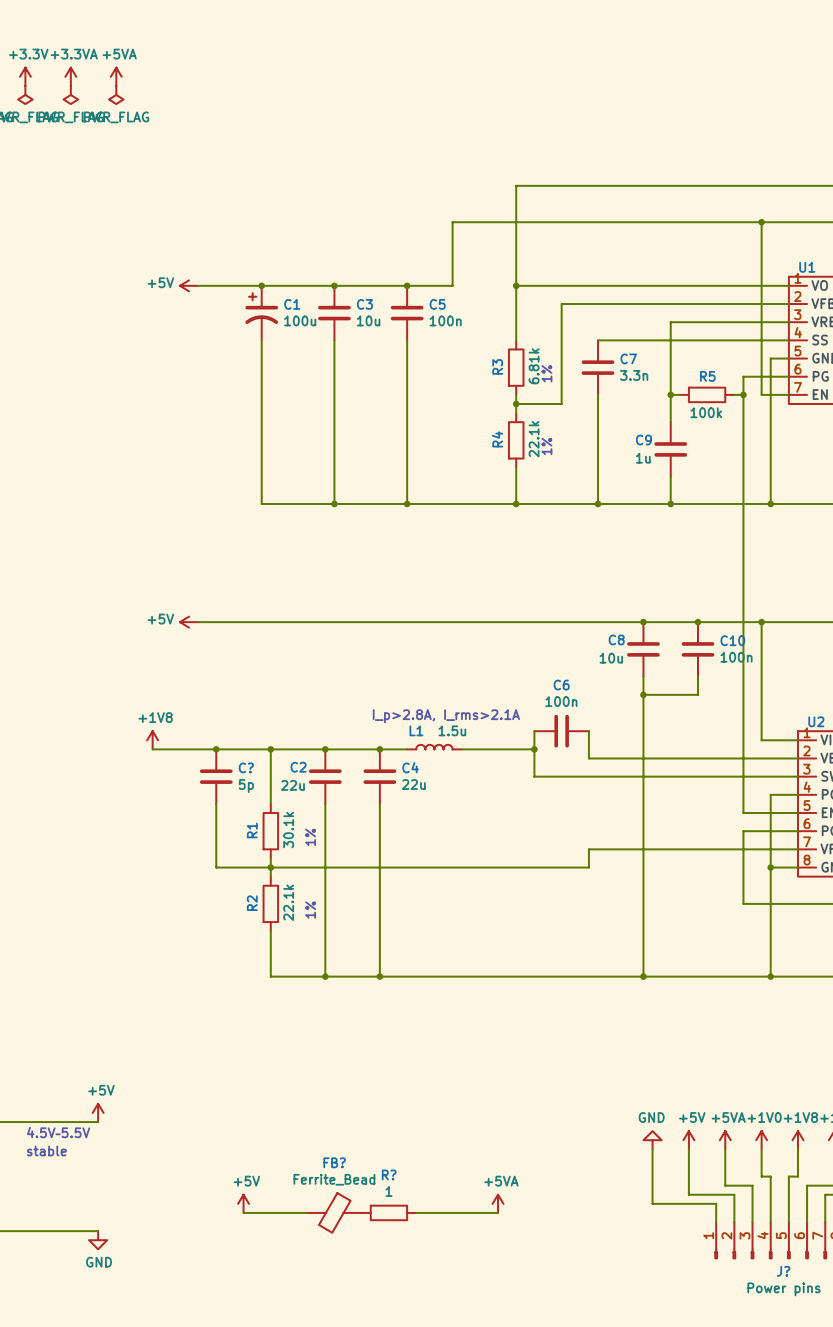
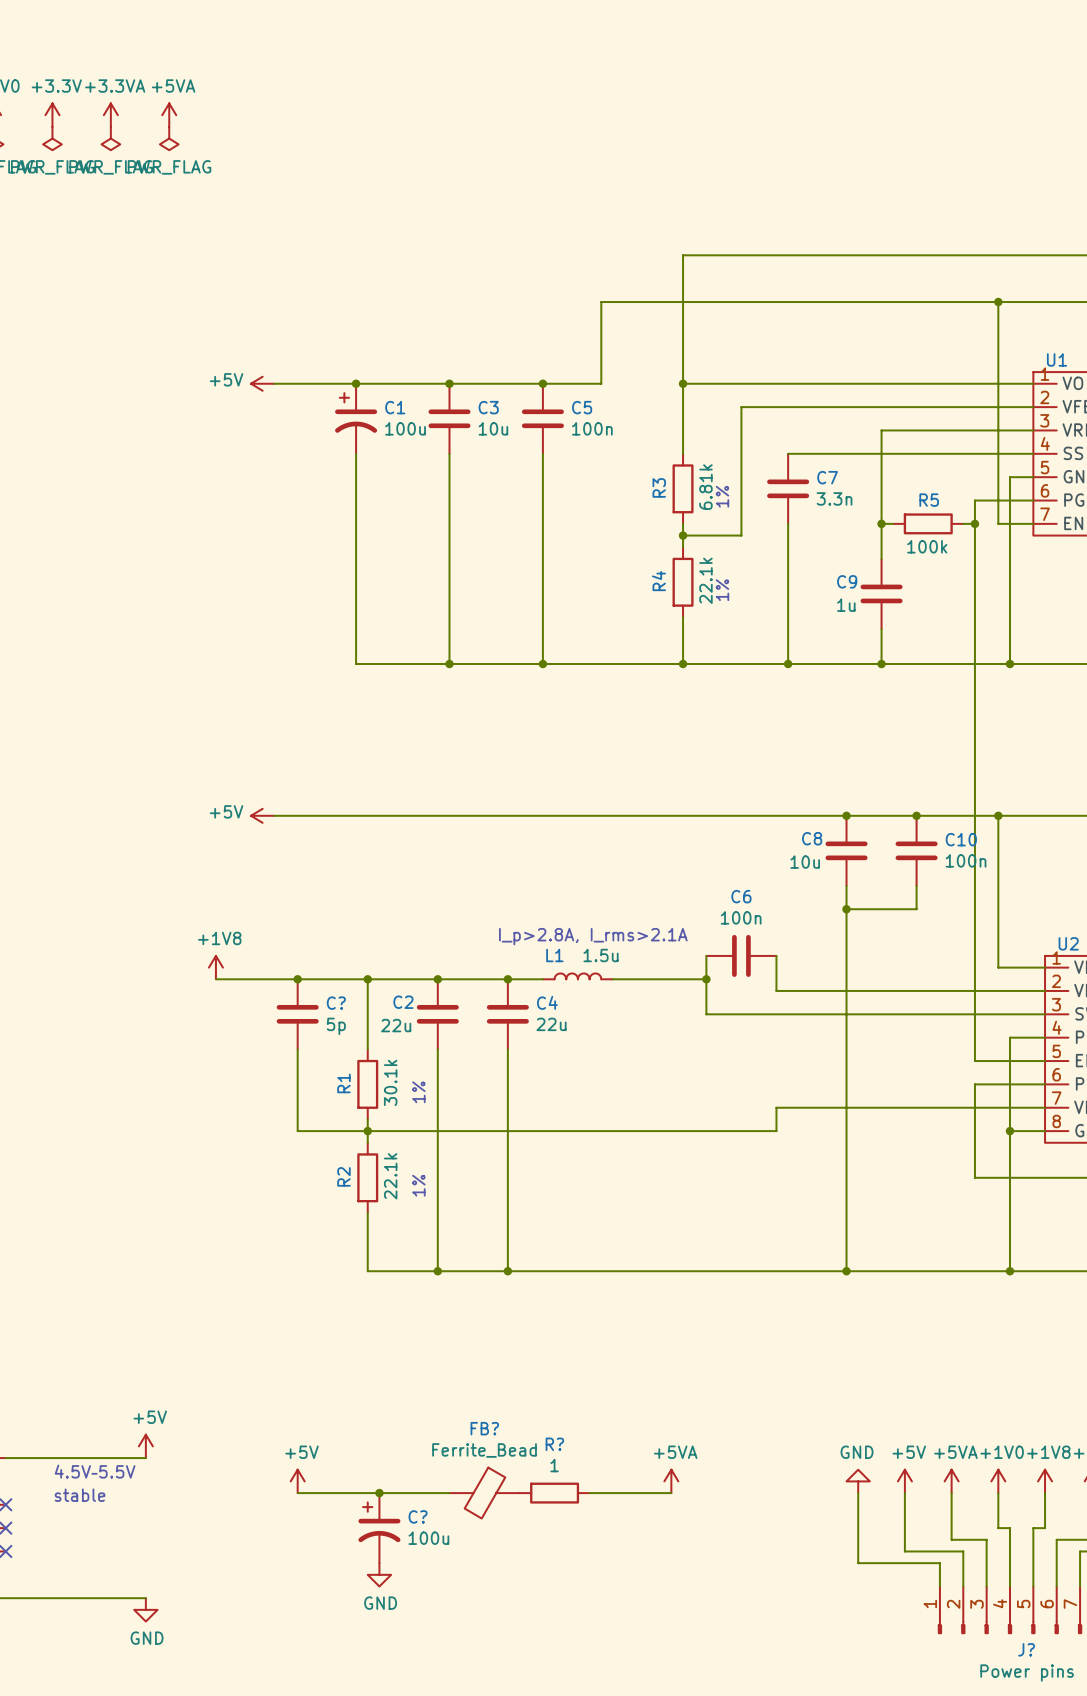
wire: none -> (297, 1493) (449, 1493)
junction: none -> (379, 1493)
wire: none -> (589, 1493) (671, 1493)
C?: none -> 100u (379, 1528)
power symbol position: +5V (243, 1203) -> +5V (297, 1481)
power symbol position: +5VA (498, 1203) -> +5VA (671, 1481)
wire: (243, 1212) (307, 1212) -> none
power symbol: none -> GND (379, 1574)
FB? position: (334, 1212) -> (484, 1493)
R? position: (388, 1212) -> (554, 1493)
wire: (416, 1212) (498, 1212) -> none

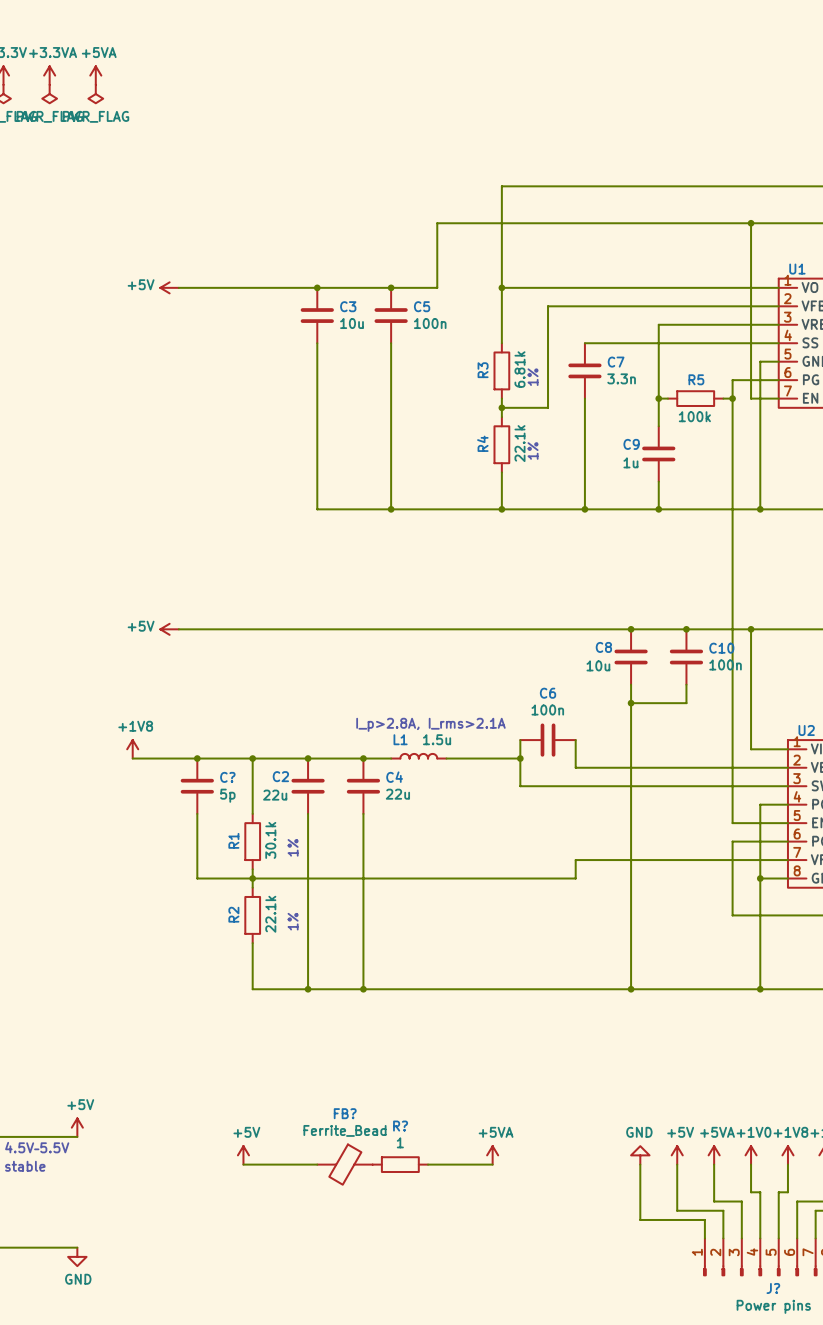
junction: (356, 383) -> none
C1: 100u (356, 418) -> none
wire: (356, 453) (356, 664) (449, 664) -> none
junction: (449, 664) -> none
power symbol position: +5V (297, 1481) -> +5V (243, 1155)
wire: (297, 1493) (356, 1493) -> none
junction: (379, 1493) -> none
C?: 100u (379, 1528) -> none
power symbol: GND (379, 1574) -> none

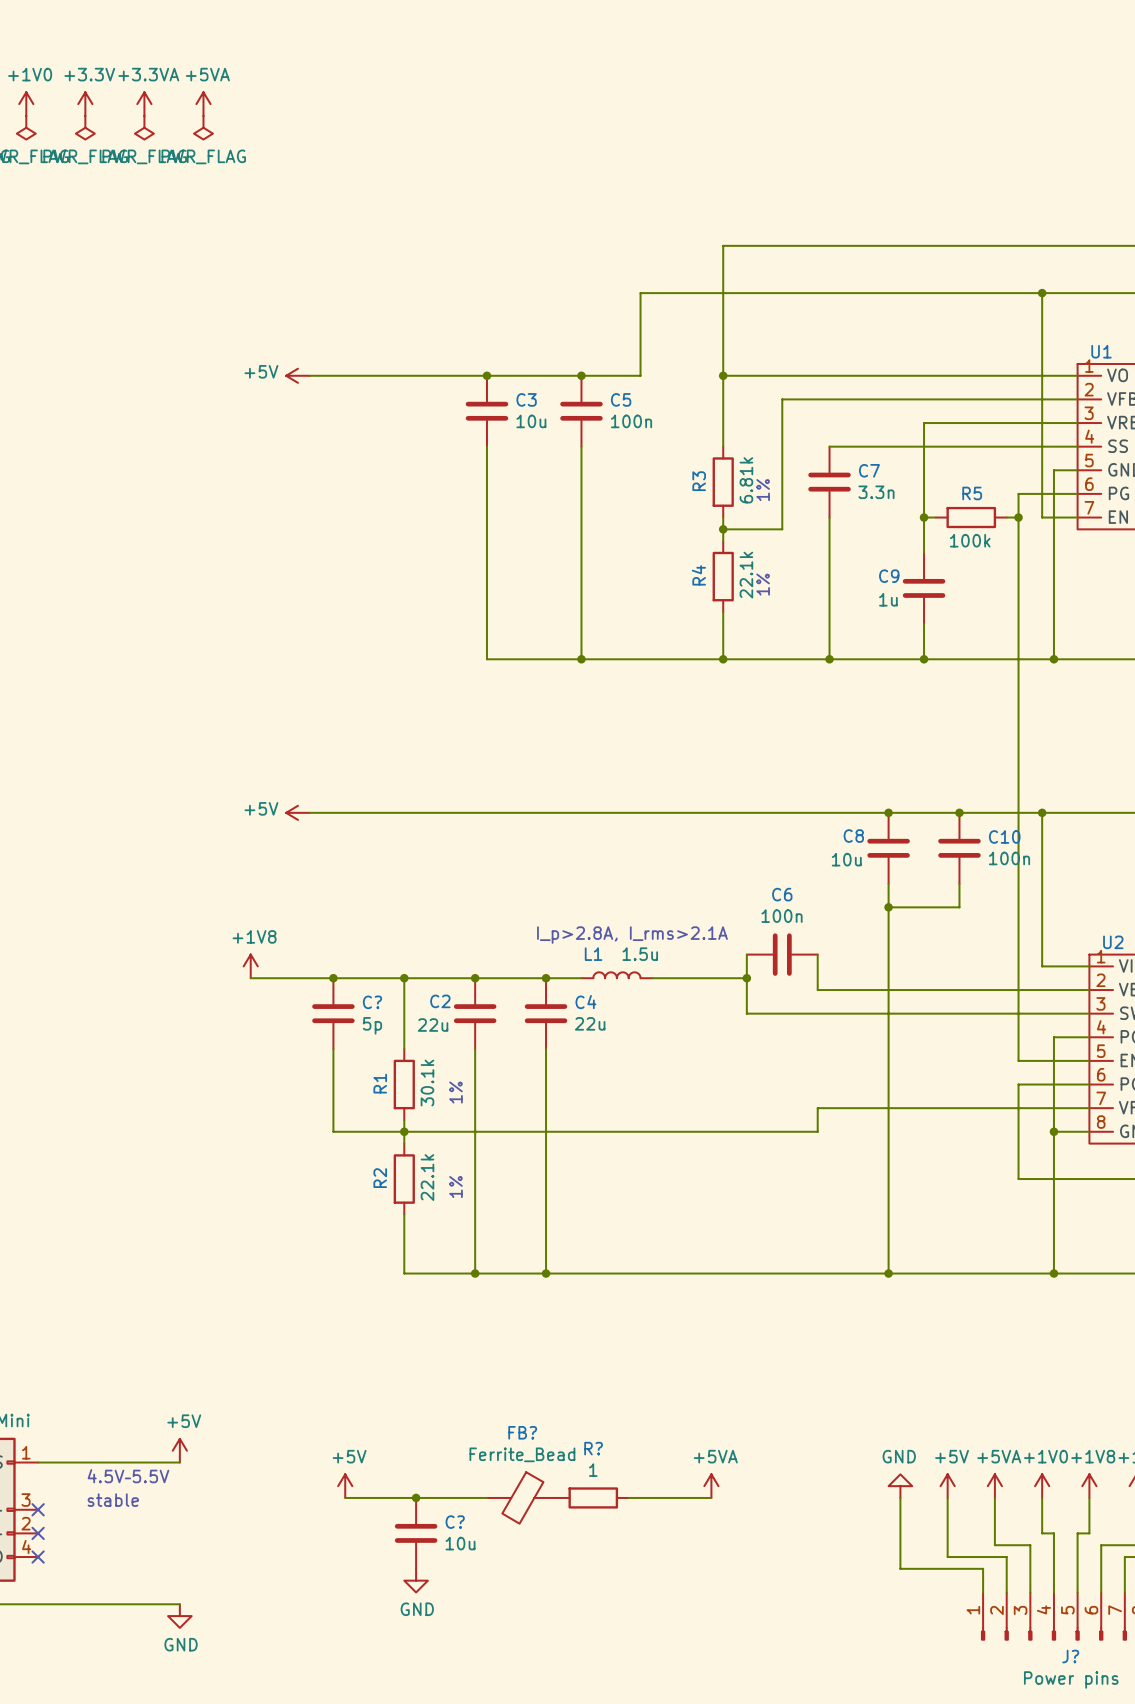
power symbol position: +5V (243, 1155) -> +5V (345, 1486)
wire: none -> (345, 1497) (392, 1497)
junction: none -> (416, 1497)
C?: none -> 10u (416, 1533)
power symbol: none -> GND (416, 1580)

